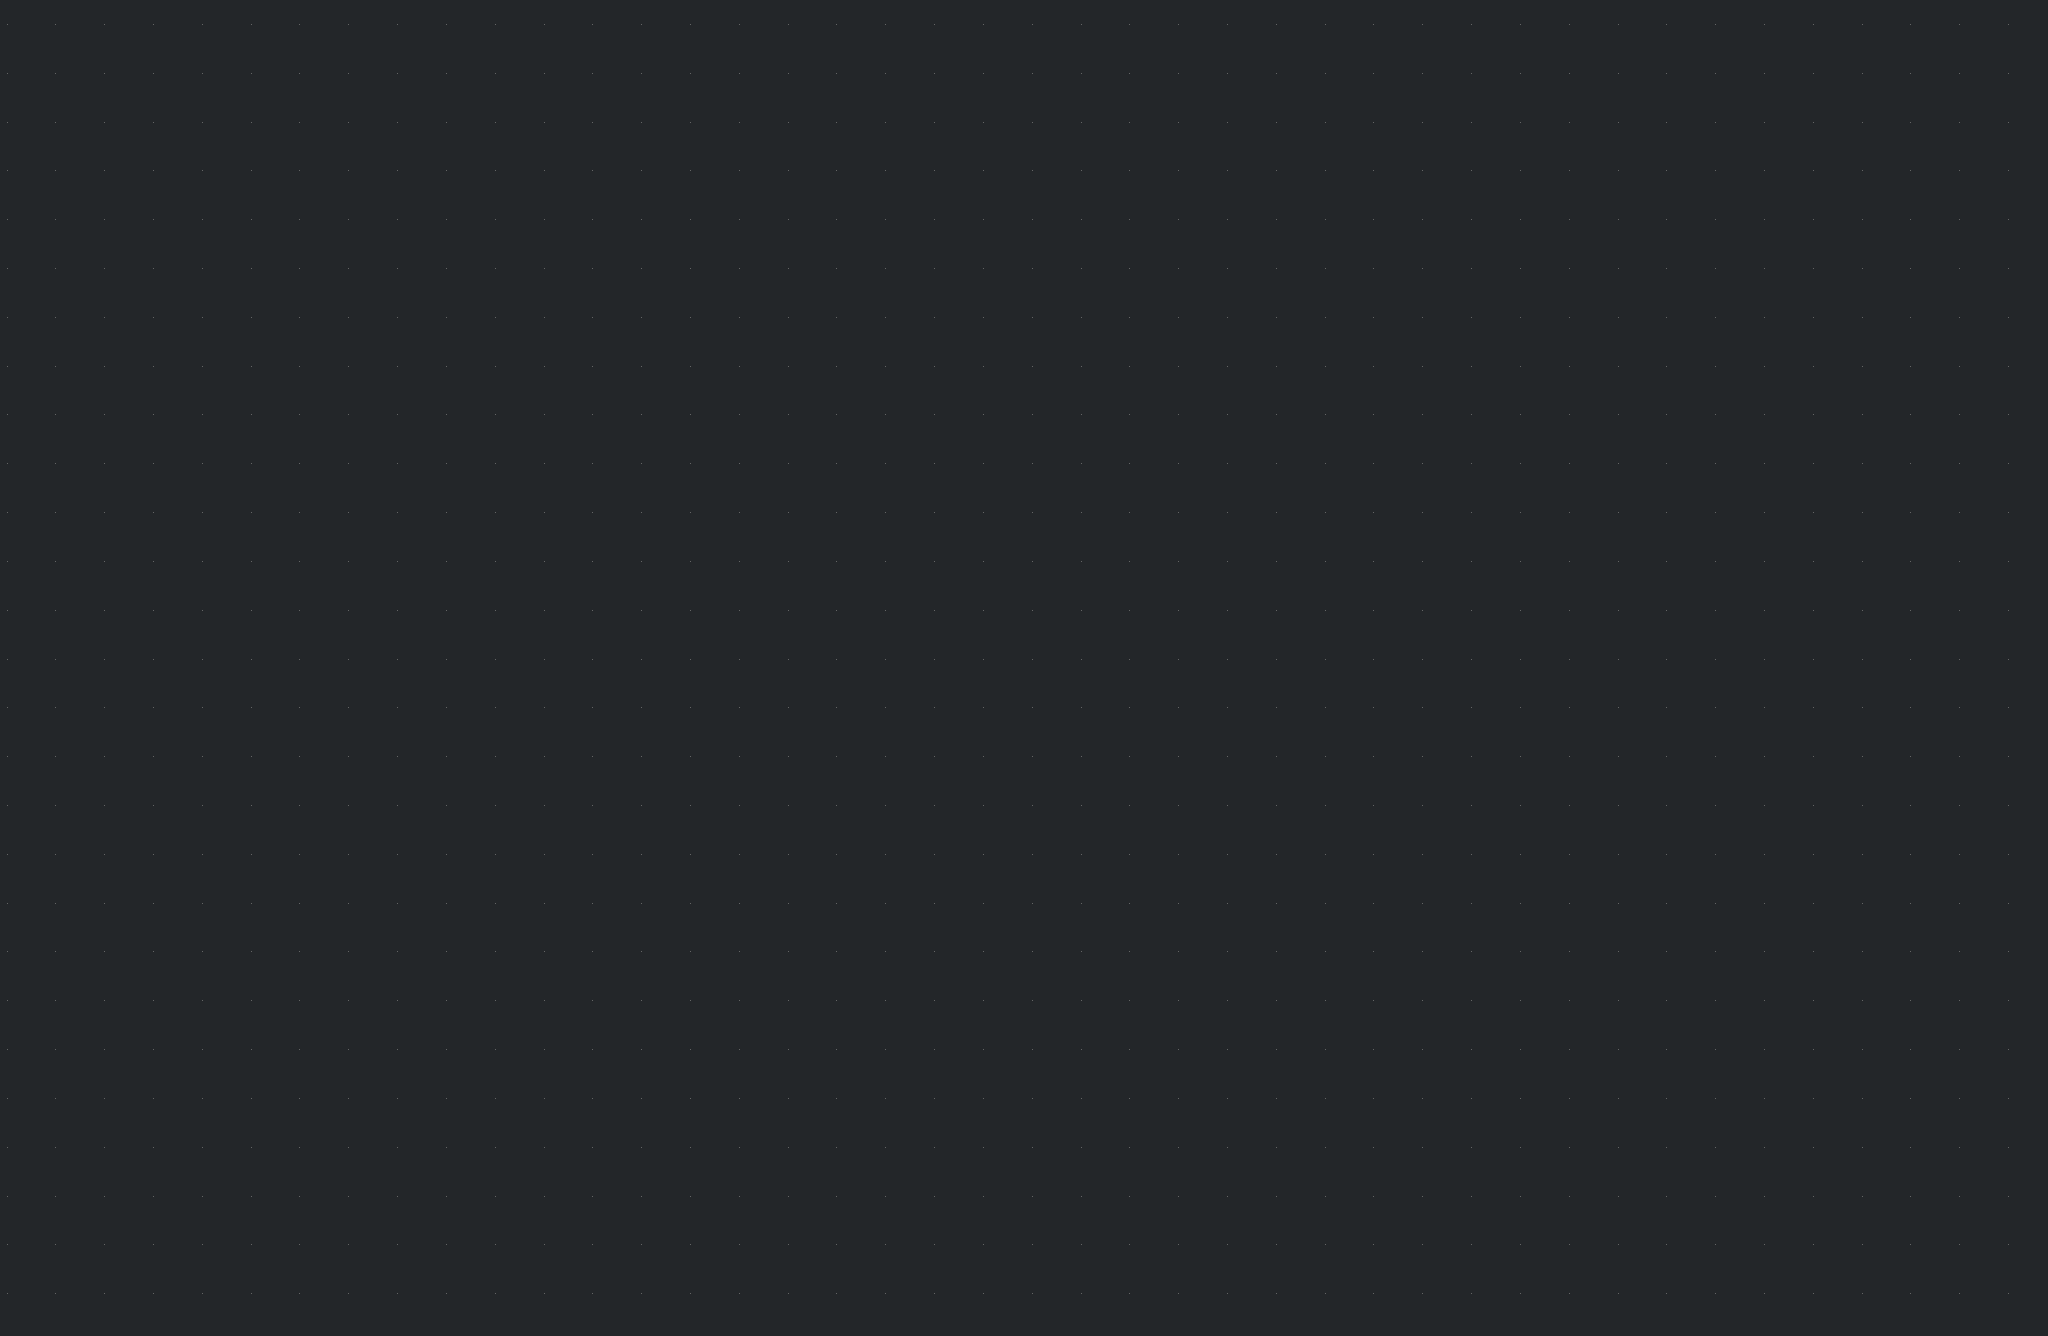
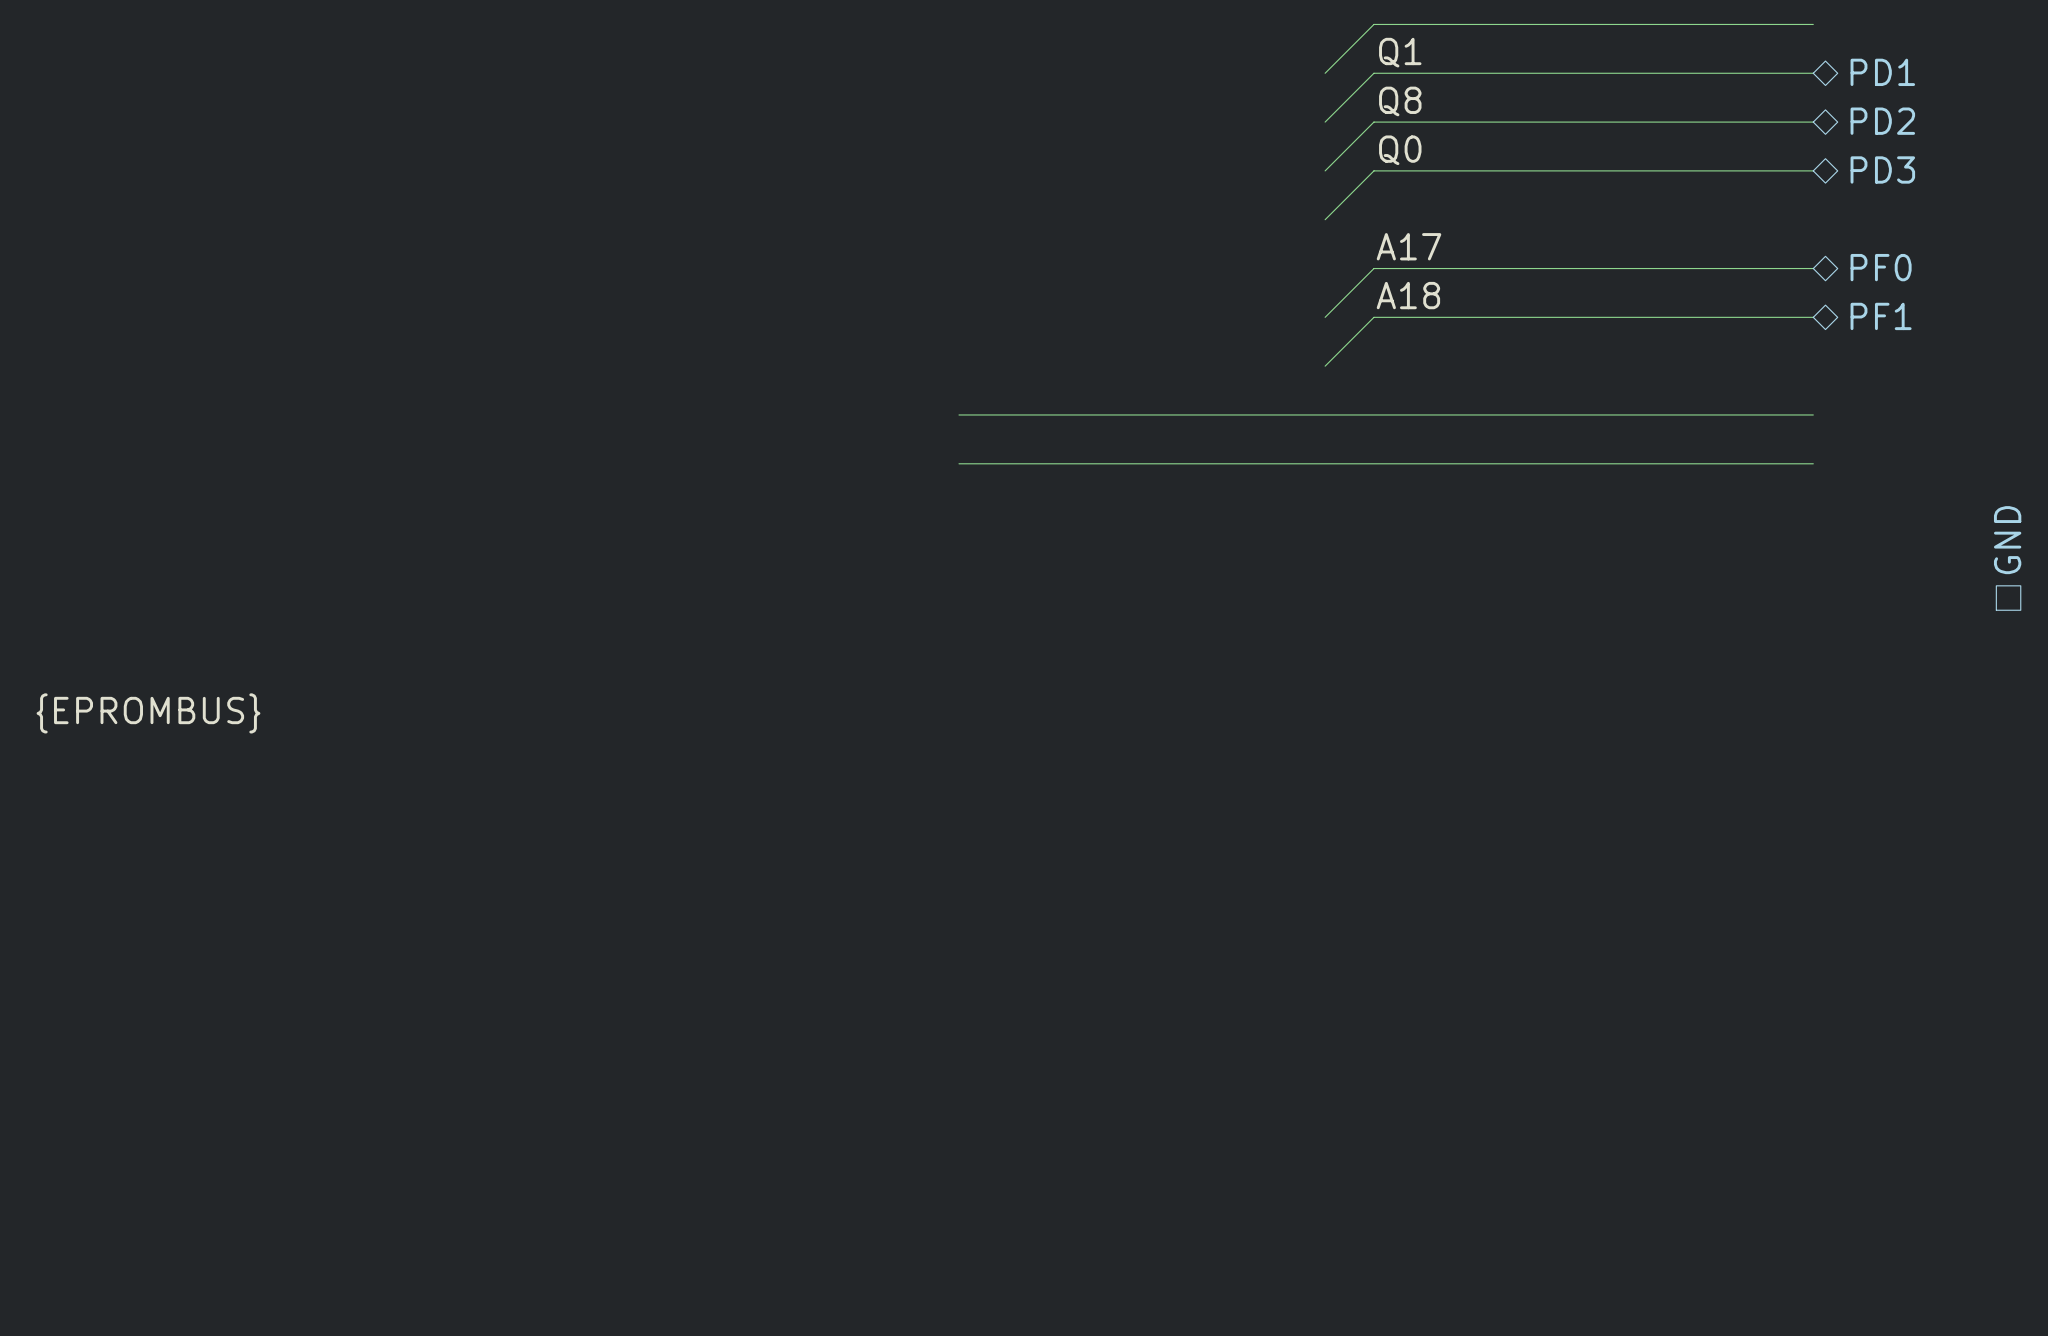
wire: none -> (1813, 24) (1373, 24) (1325, 73)
label: none -> Q1 (1400, 52)
sheet pin: none -> PD1 (1882, 72)
wire: none -> (1813, 73) (1373, 73) (1325, 122)
label: none -> Q8 (1400, 101)
sheet pin: none -> PD2 (1882, 121)
wire: none -> (1813, 122) (1373, 122) (1325, 170)
label: none -> Q0 (1400, 150)
sheet pin: none -> PD3 (1882, 169)
wire: none -> (1813, 170) (1373, 170) (1325, 219)
label: none -> A17 (1408, 246)
sheet pin: none -> PF0 (1881, 267)
wire: none -> (1813, 268) (1373, 268) (1325, 317)
label: none -> A18 (1408, 295)
sheet pin: none -> PF1 (1881, 316)
wire: none -> (1813, 317) (1373, 317) (1325, 366)
wire: none -> (959, 414) (1813, 414)
wire: none -> (959, 463) (1813, 463)
sheet pin: none -> GND (2007, 540)
label: none -> {EPROMBUS} (148, 713)

